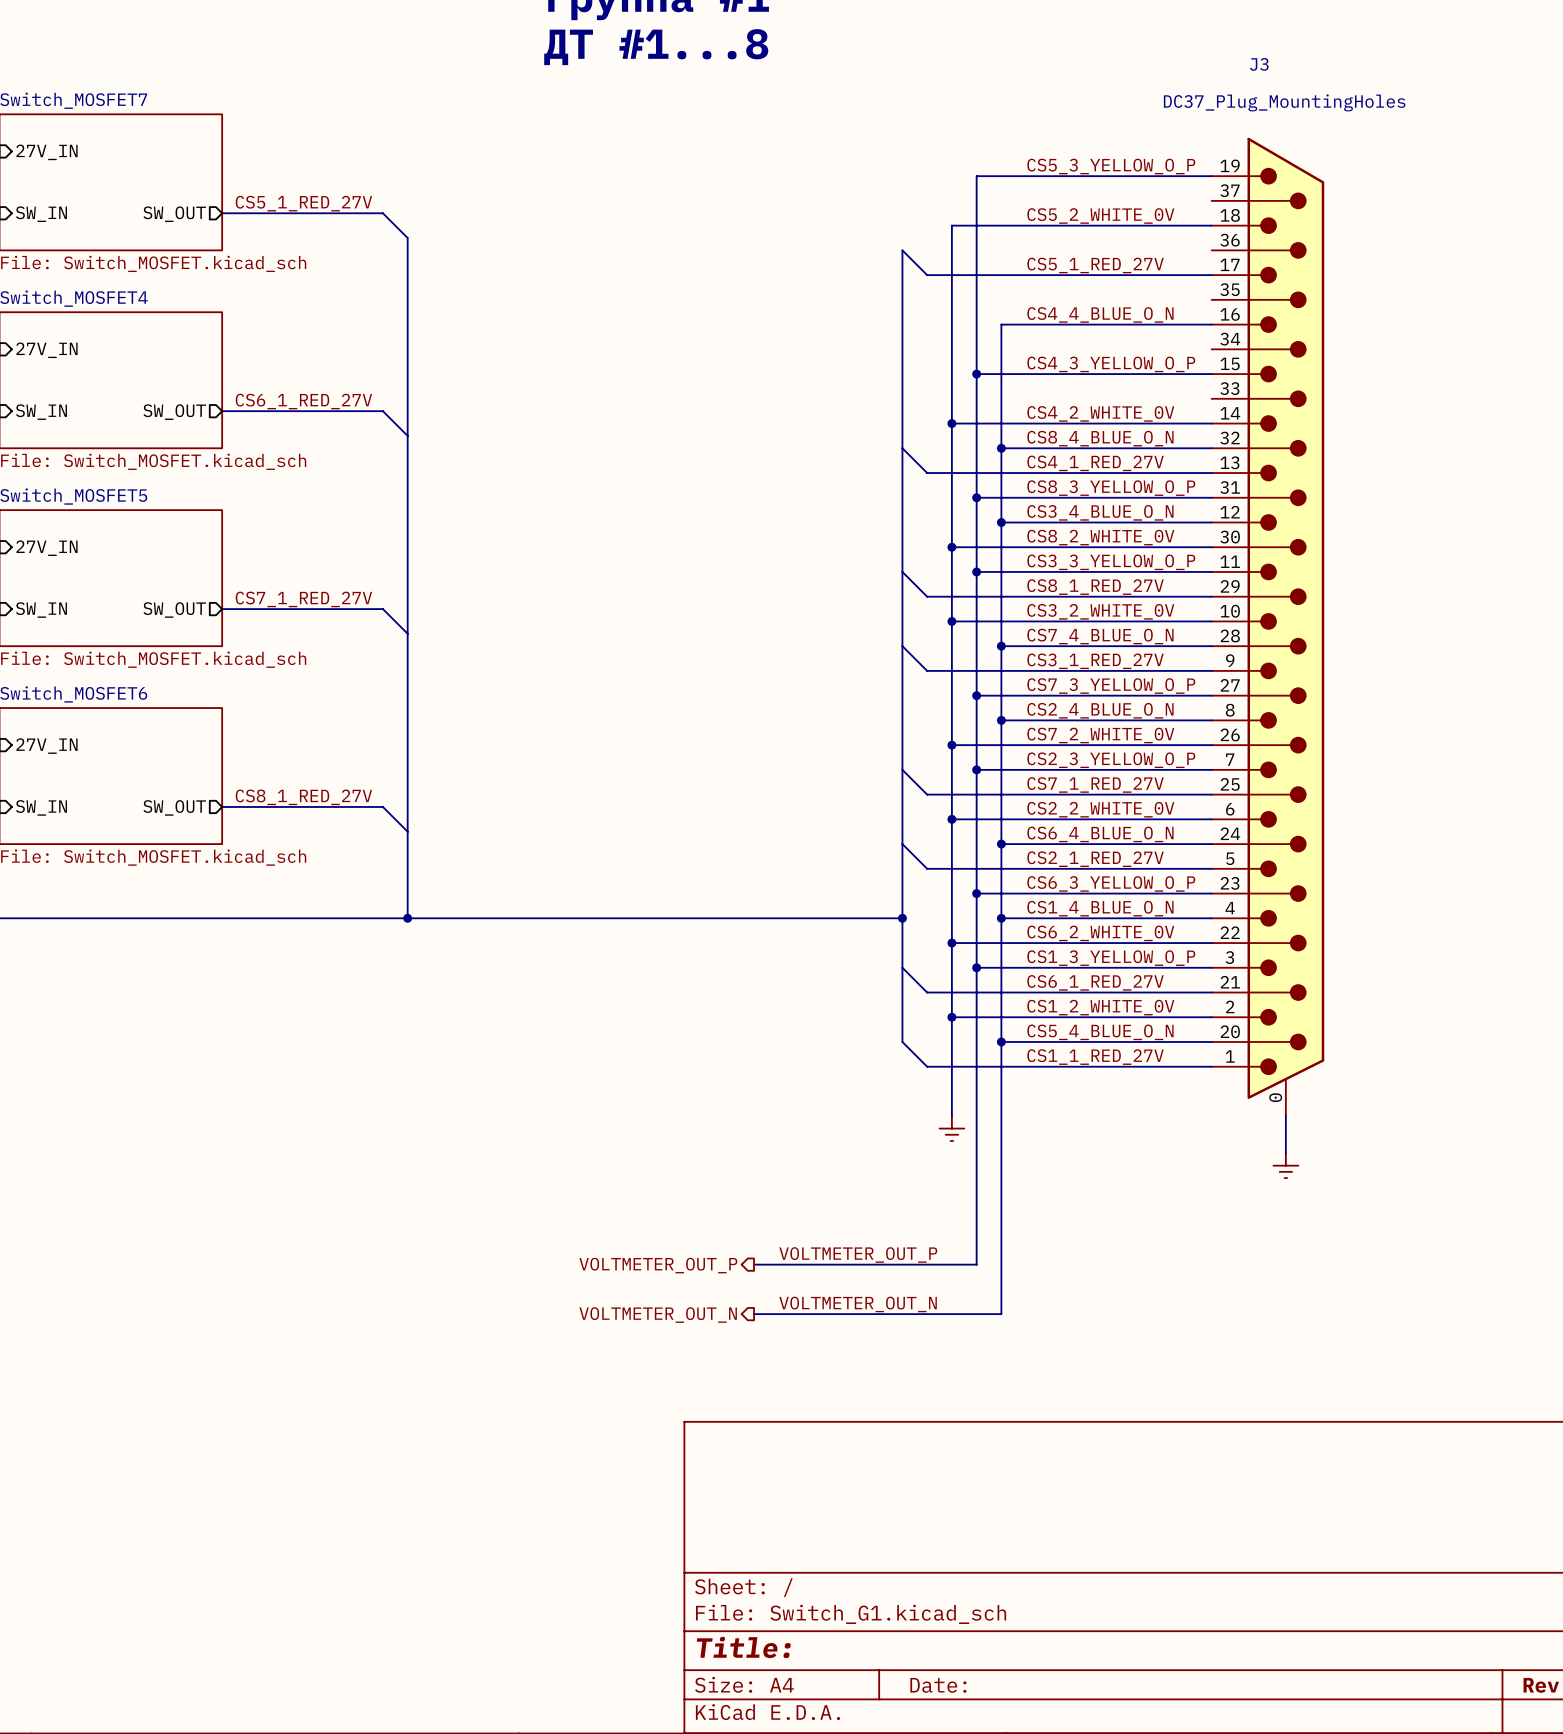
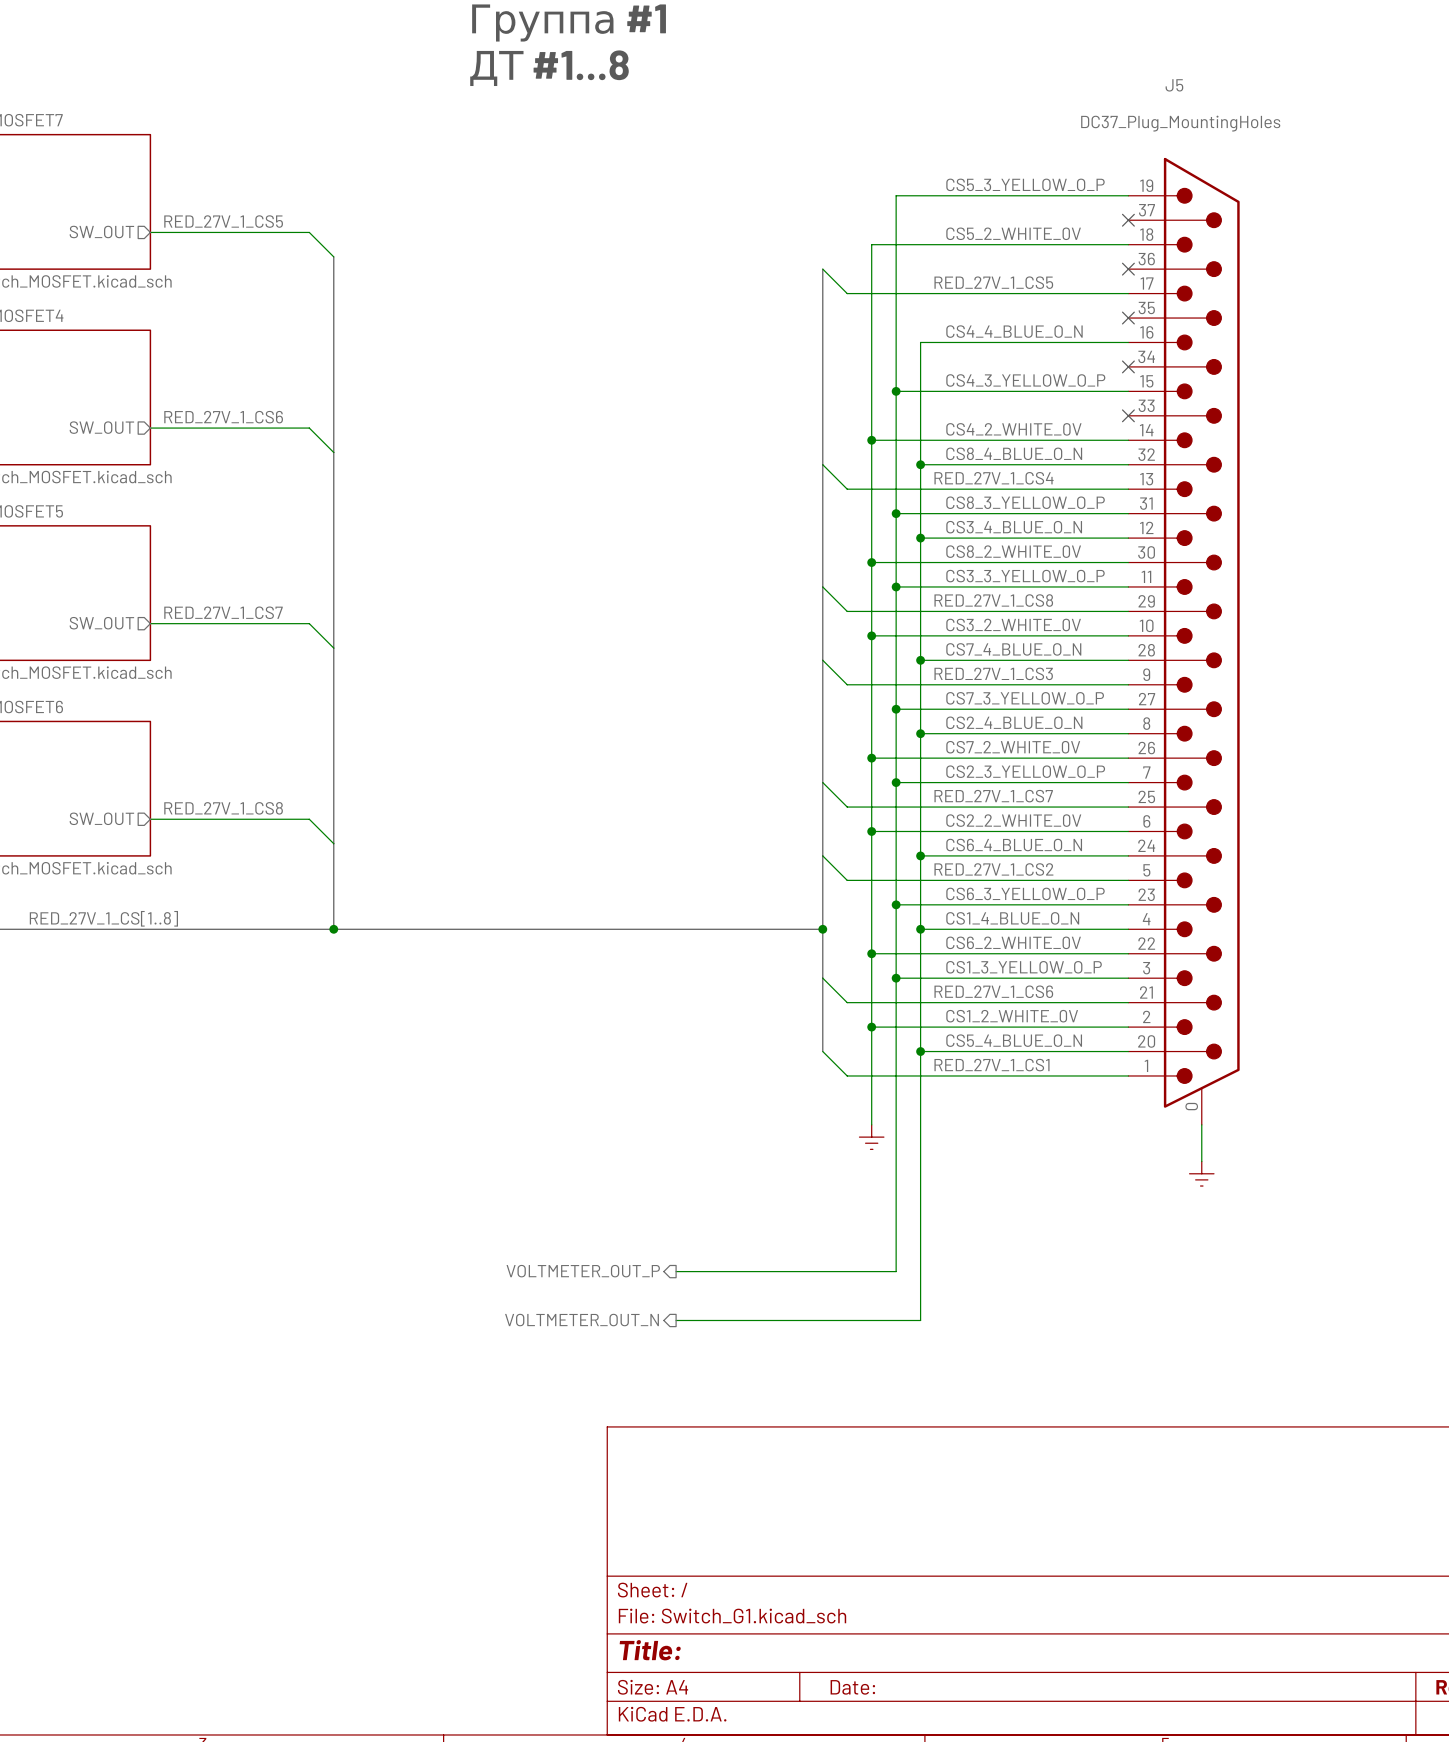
J3 name: J3 (1259, 64) -> J5 (1174, 85)
no-connect mark: none -> (1128, 220)
label: CS5_1_RED_27V (303, 203) -> RED_27V_1_CS5 (223, 221)
no-connect mark: none -> (1128, 269)
label: none -> RED_27V_1_CS5 (993, 282)
label: CS5_1_RED_27V (1095, 265) -> none
no-connect mark: none -> (1128, 318)
no-connect mark: none -> (1128, 366)
no-connect mark: none -> (1128, 415)
label: CS6_1_RED_27V (303, 401) -> RED_27V_1_CS6 (223, 417)
label: none -> RED_27V_1_CS4 (994, 478)
label: CS4_1_RED_27V (1095, 463) -> none
label: none -> RED_27V_1_CS8 (993, 600)
label: CS8_1_RED_27V (1095, 587) -> none
label: CS7_1_RED_27V (303, 599) -> RED_27V_1_CS7 (223, 612)
label: none -> RED_27V_1_CS3 (993, 673)
label: CS3_1_RED_27V (1095, 661) -> none
label: none -> RED_27V_1_CS7 (993, 796)
label: CS7_1_RED_27V (1095, 784) -> none
label: CS8_1_RED_27V (303, 797) -> RED_27V_1_CS8 (223, 808)
label: none -> RED_27V_1_CS2 (993, 869)
label: CS2_1_RED_27V (1095, 859) -> none
label: none -> RED_27V_1_CS[1..8] (103, 918)
label: none -> RED_27V_1_CS6 (993, 991)
label: CS6_1_RED_27V (1095, 982) -> none
label: none -> RED_27V_1_CS1 (991, 1065)
label: CS1_1_RED_27V (1095, 1057) -> none
label: VOLTMETER_OUT_P (858, 1254) -> none
label: VOLTMETER_OUT_N (858, 1304) -> none

